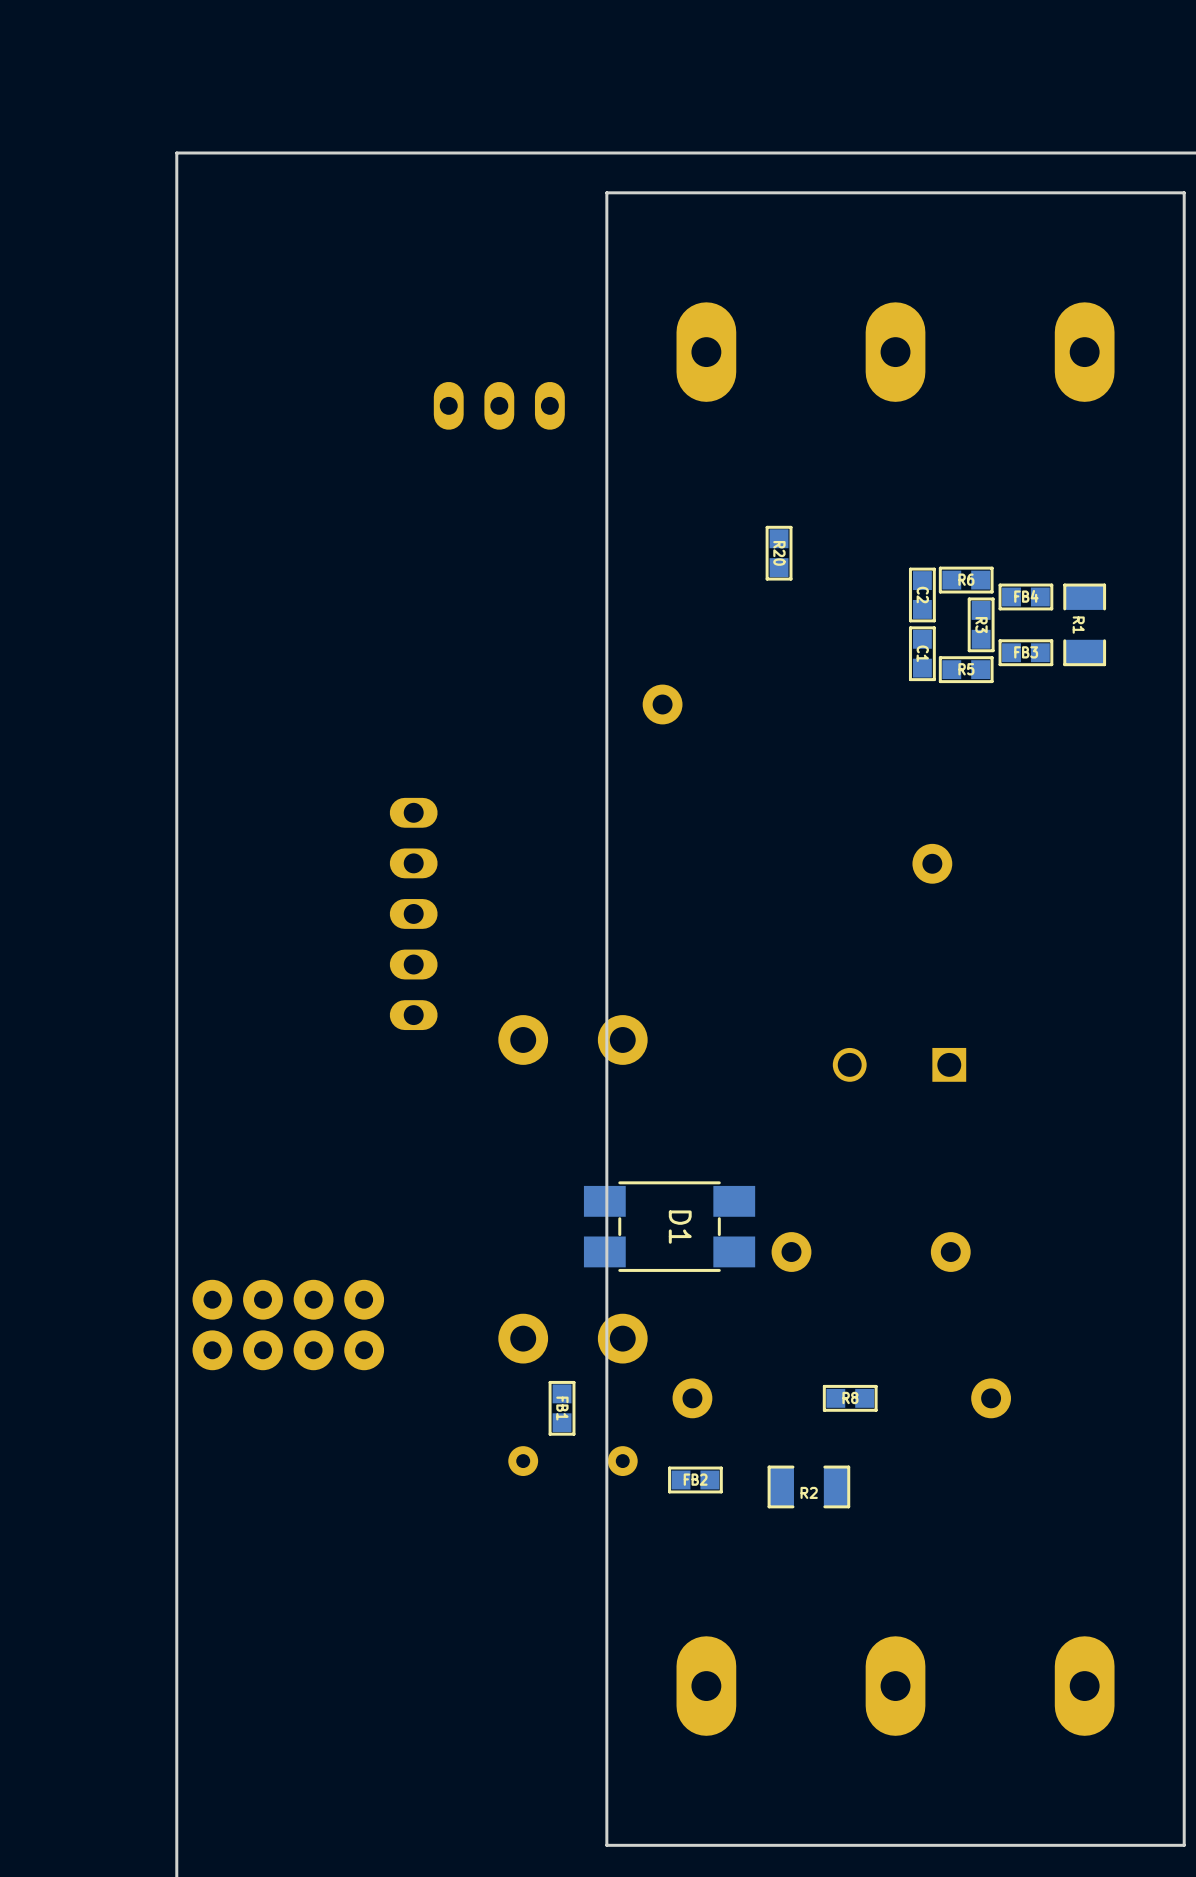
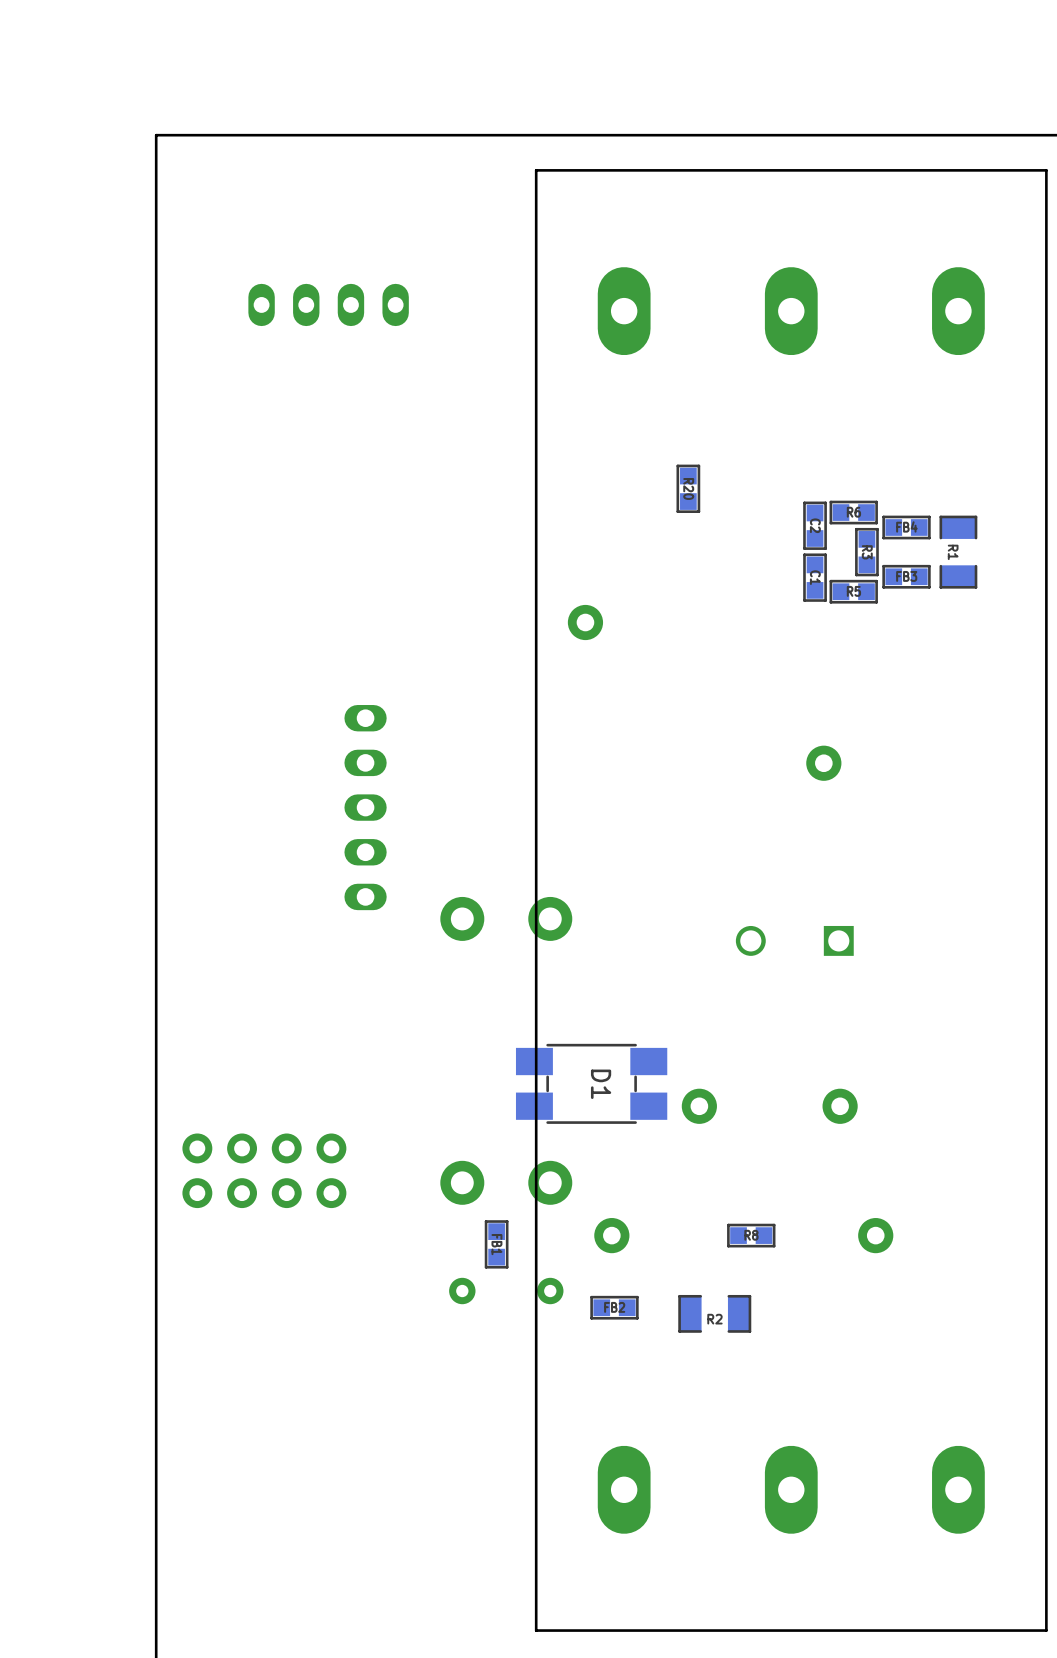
part: none -> (328, 304)
part: (499, 405) -> none
part footprint: [192, 1279, 385, 1371] -> [182, 1133, 347, 1209]

